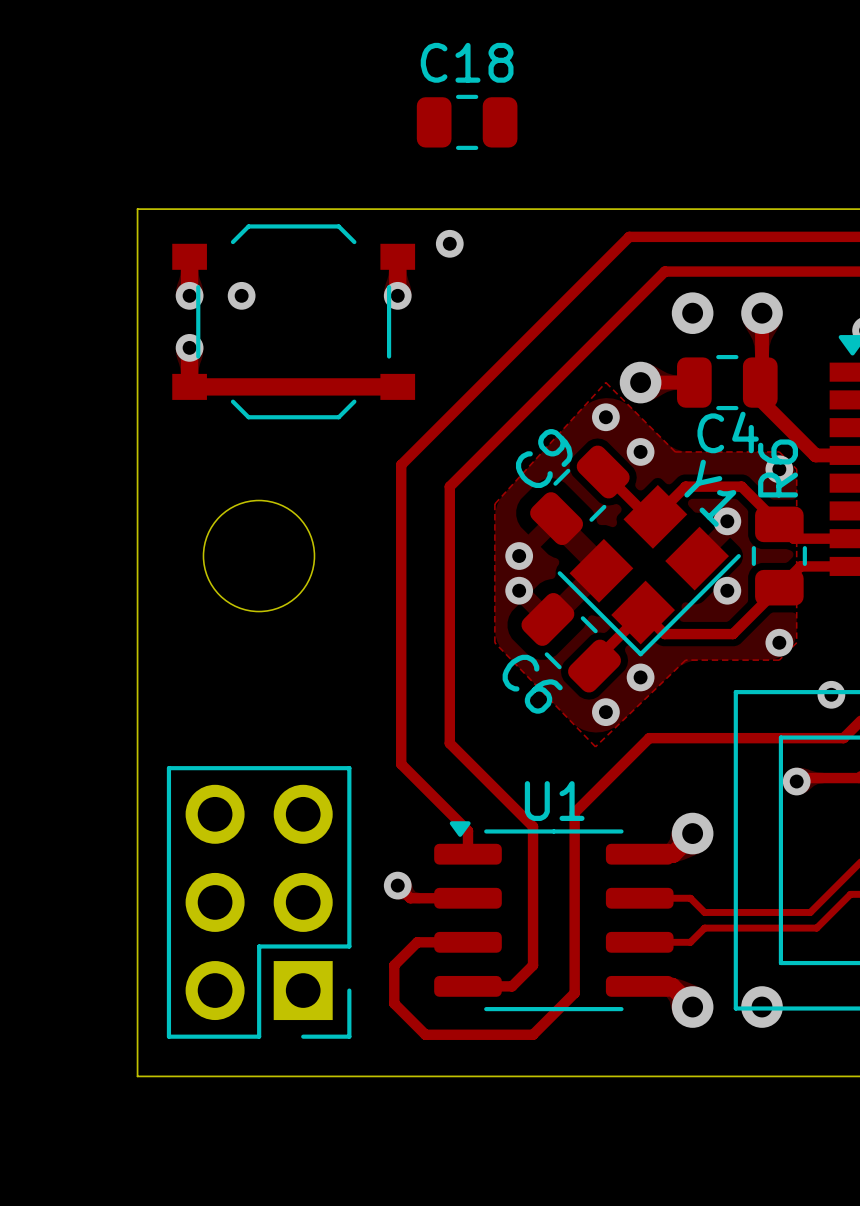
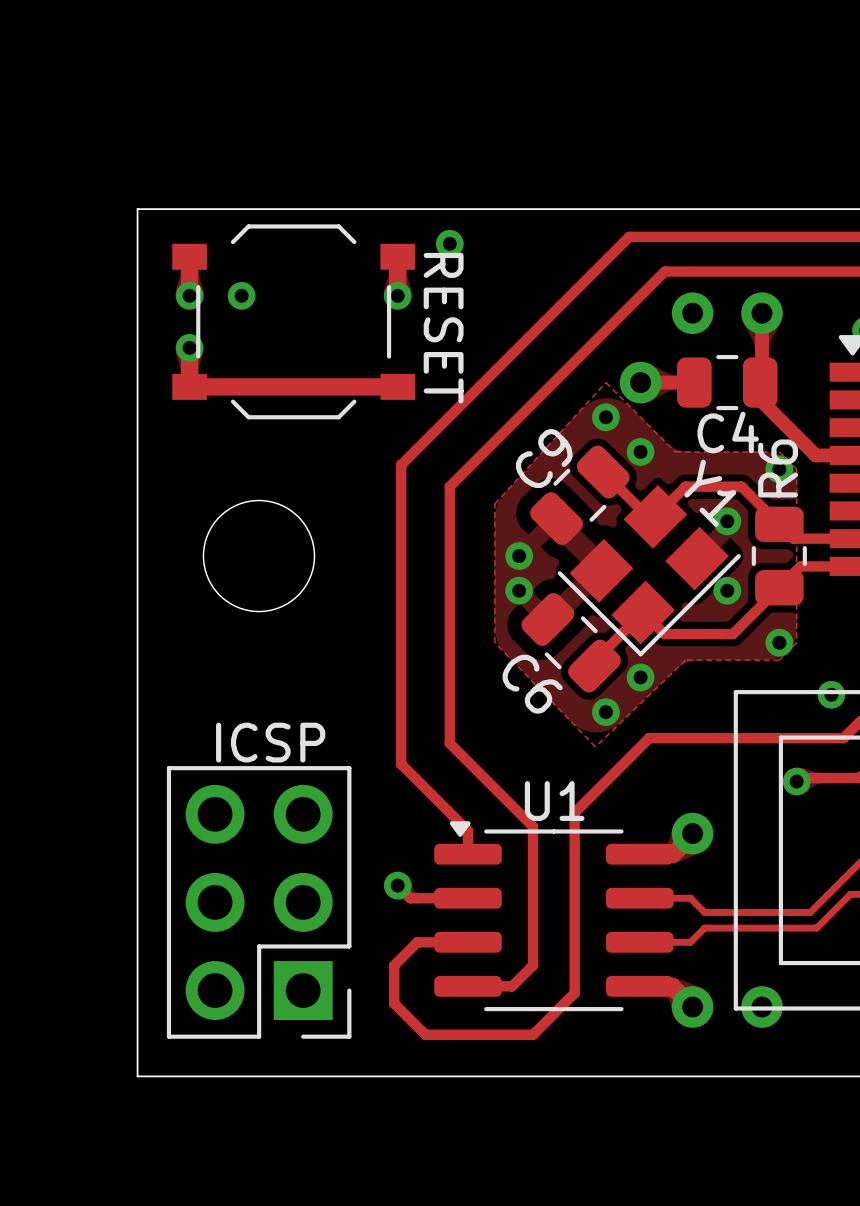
C18: (467, 122) -> none
text: none -> RESET (443, 328)
text: none -> ICSP (270, 742)

